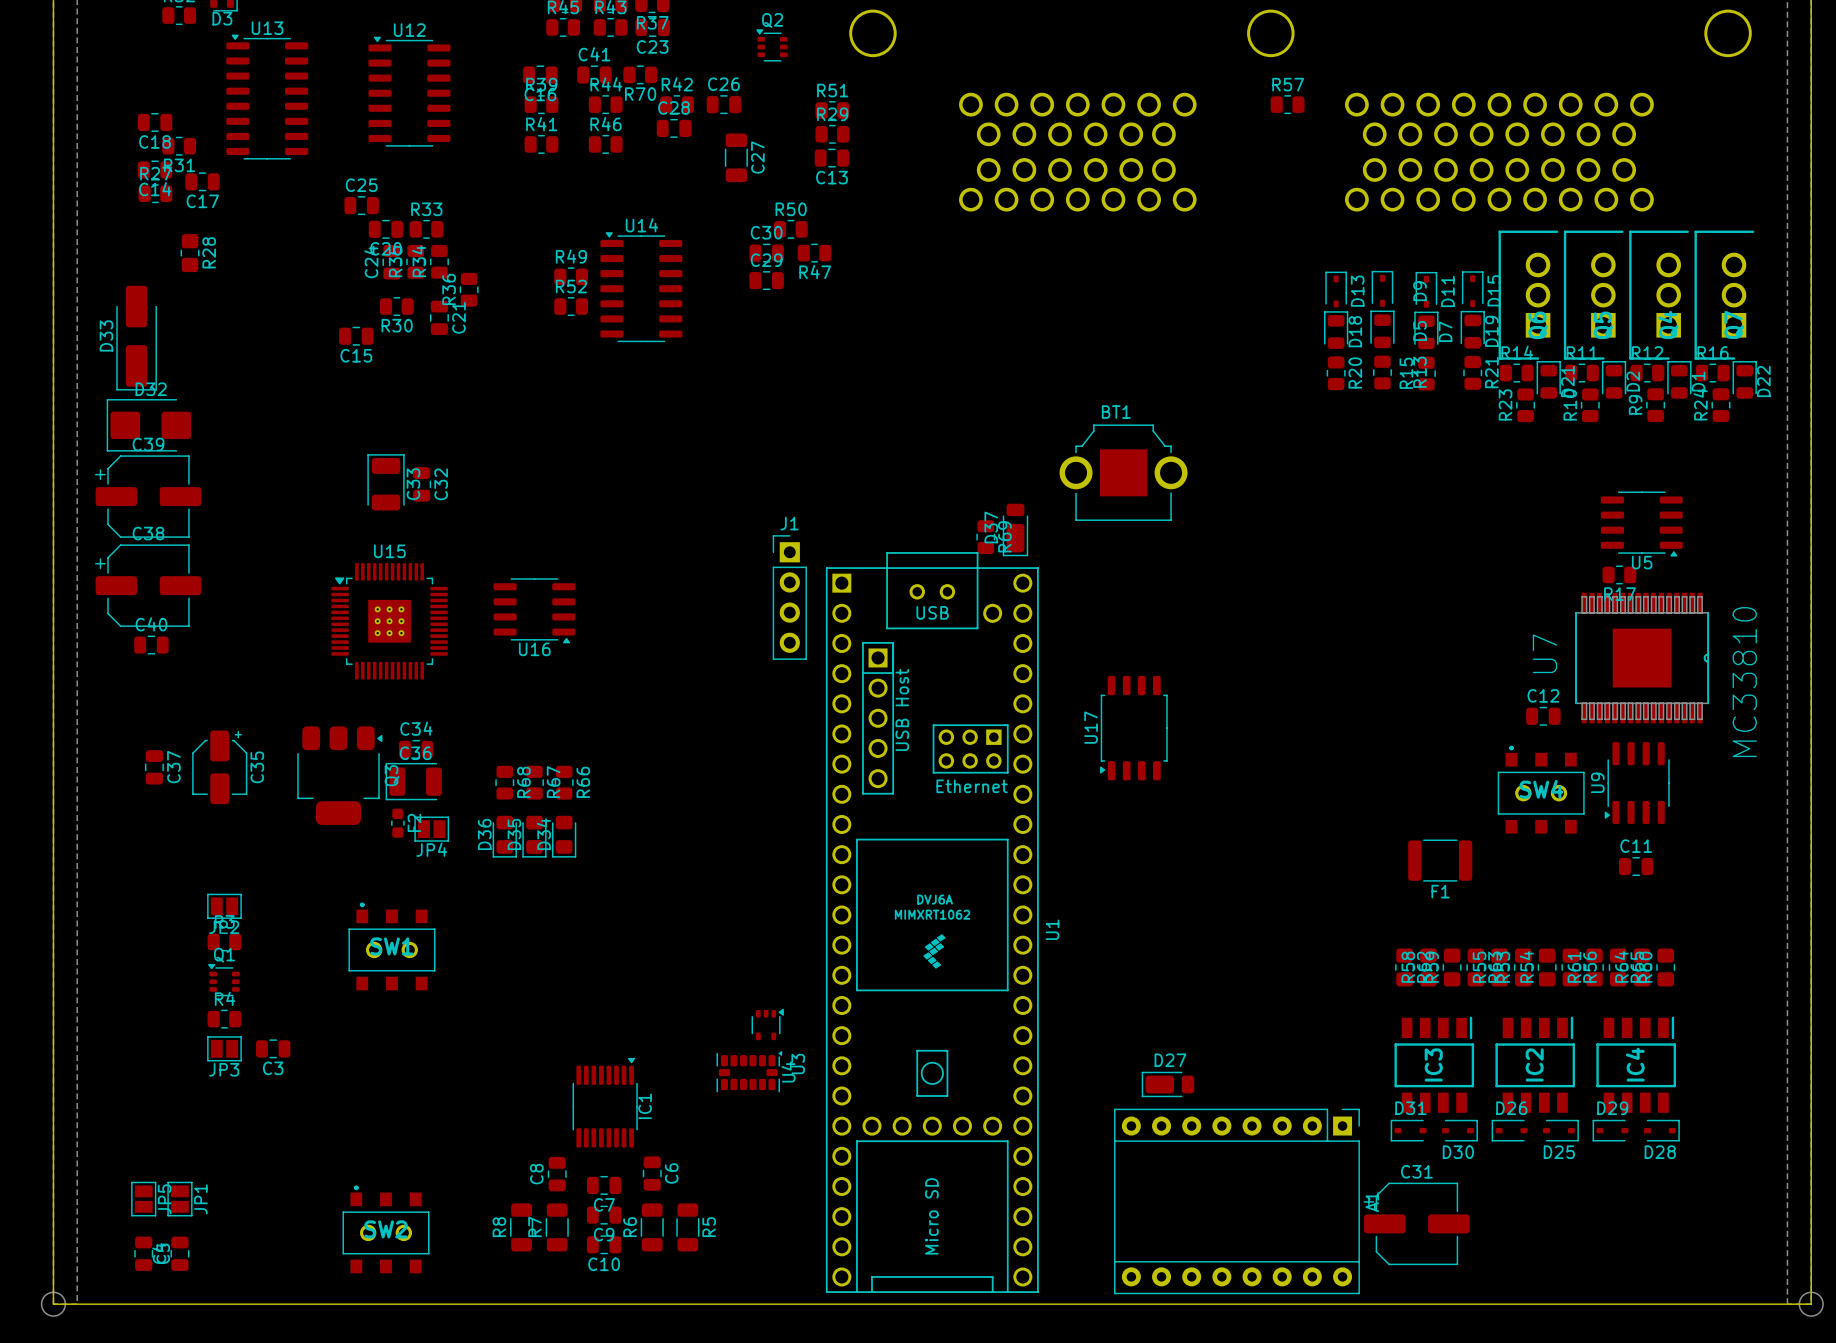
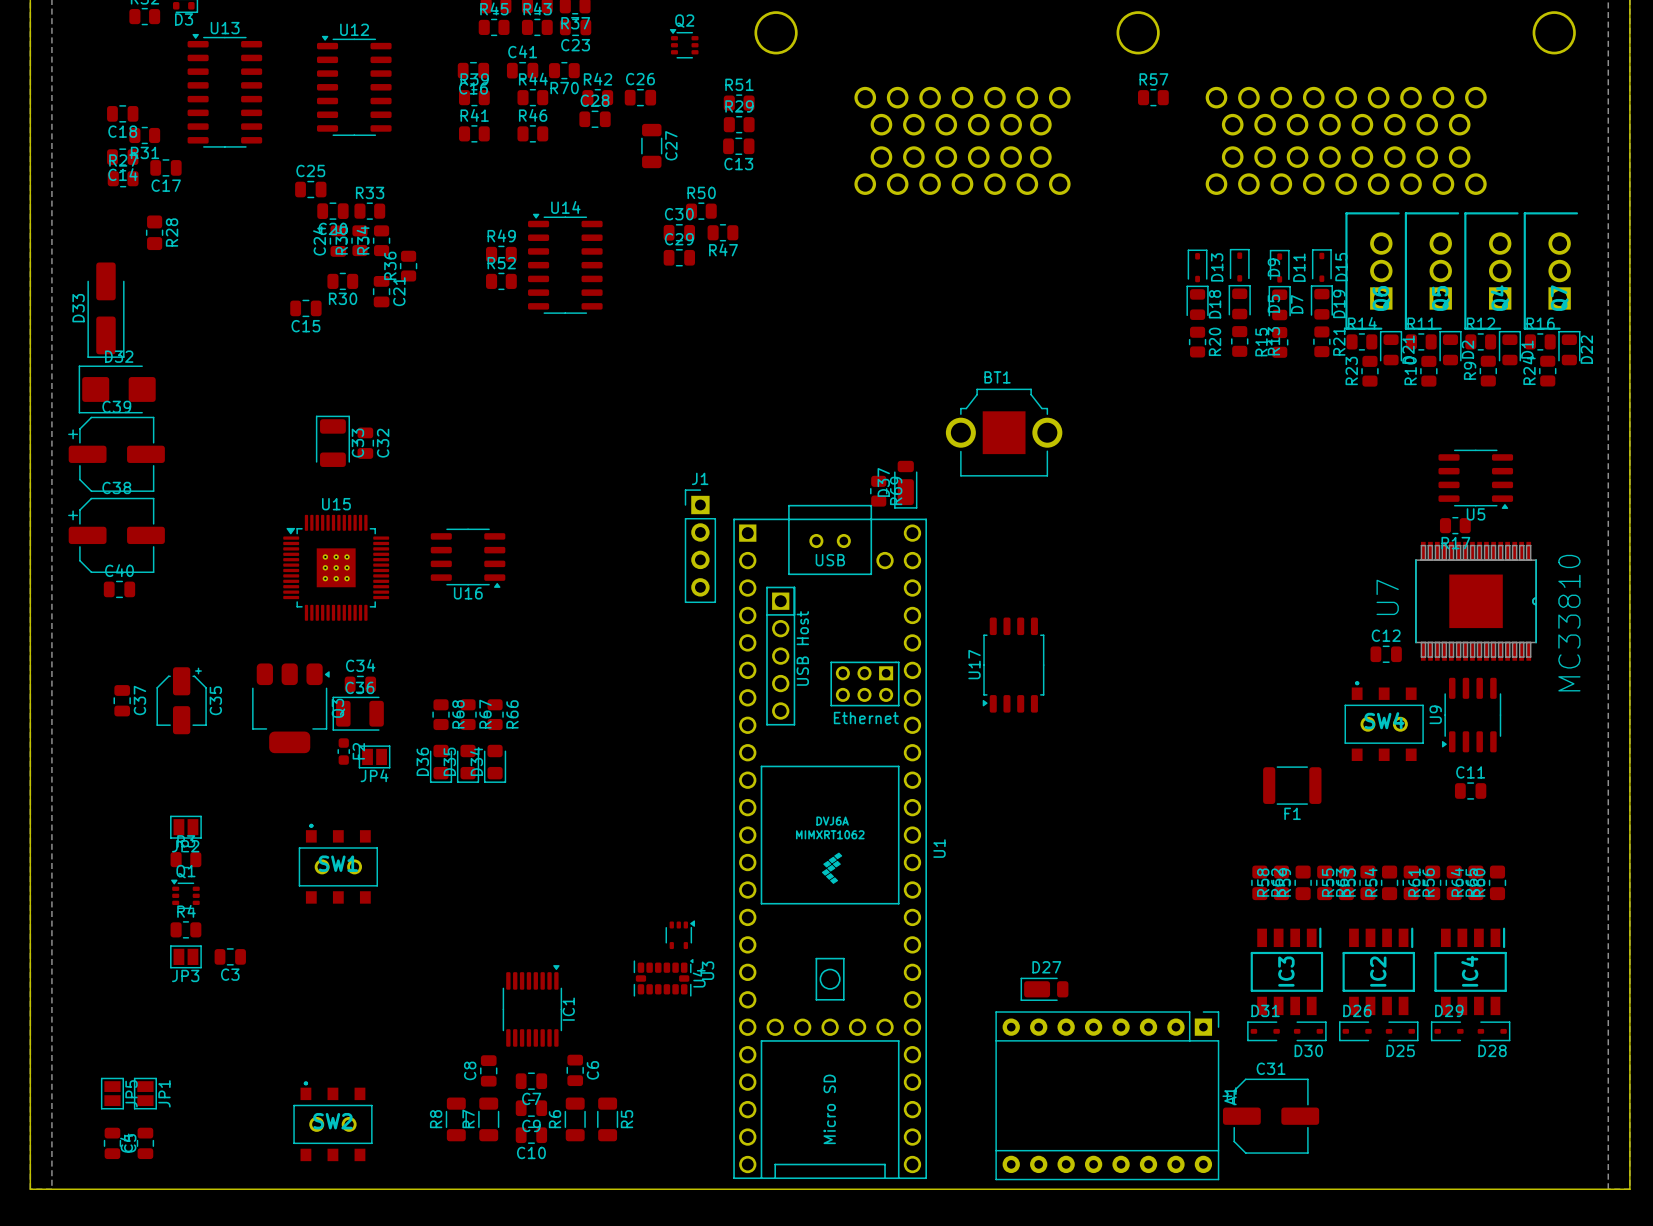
drawing: [40, 1291, 66, 1317] -> none
drawing: [1798, 1291, 1824, 1317] -> none

